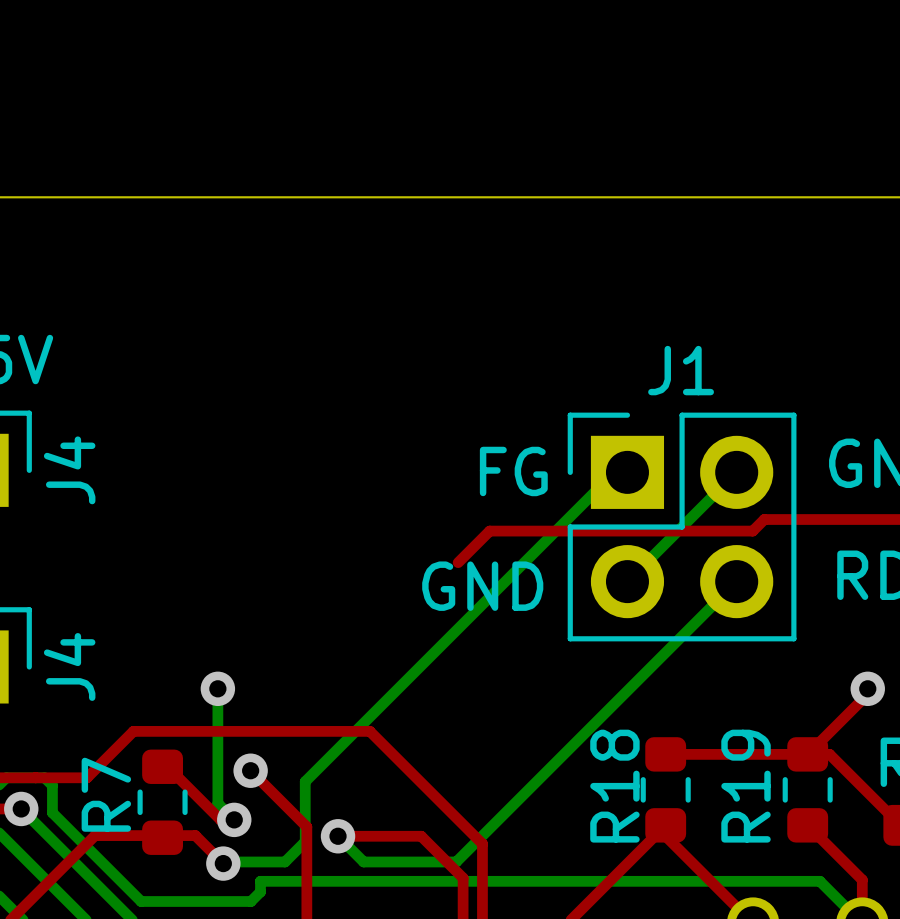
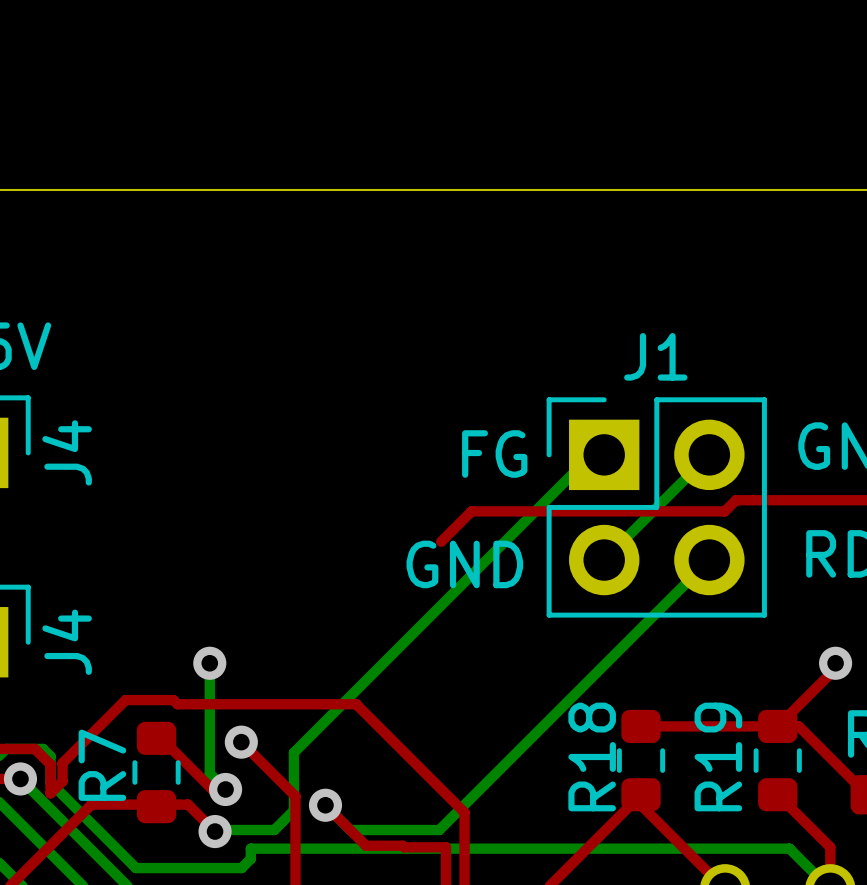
top track: (184, 731) (133, 731) (87, 777) (36, 777) -> (177, 704) (173, 700) (125, 700) (62, 763) (62, 781) (50, 793) (50, 764) (34, 748)
top track: (338, 836) (421, 836) (463, 879) -> (325, 805) (365, 845) (445, 847)

